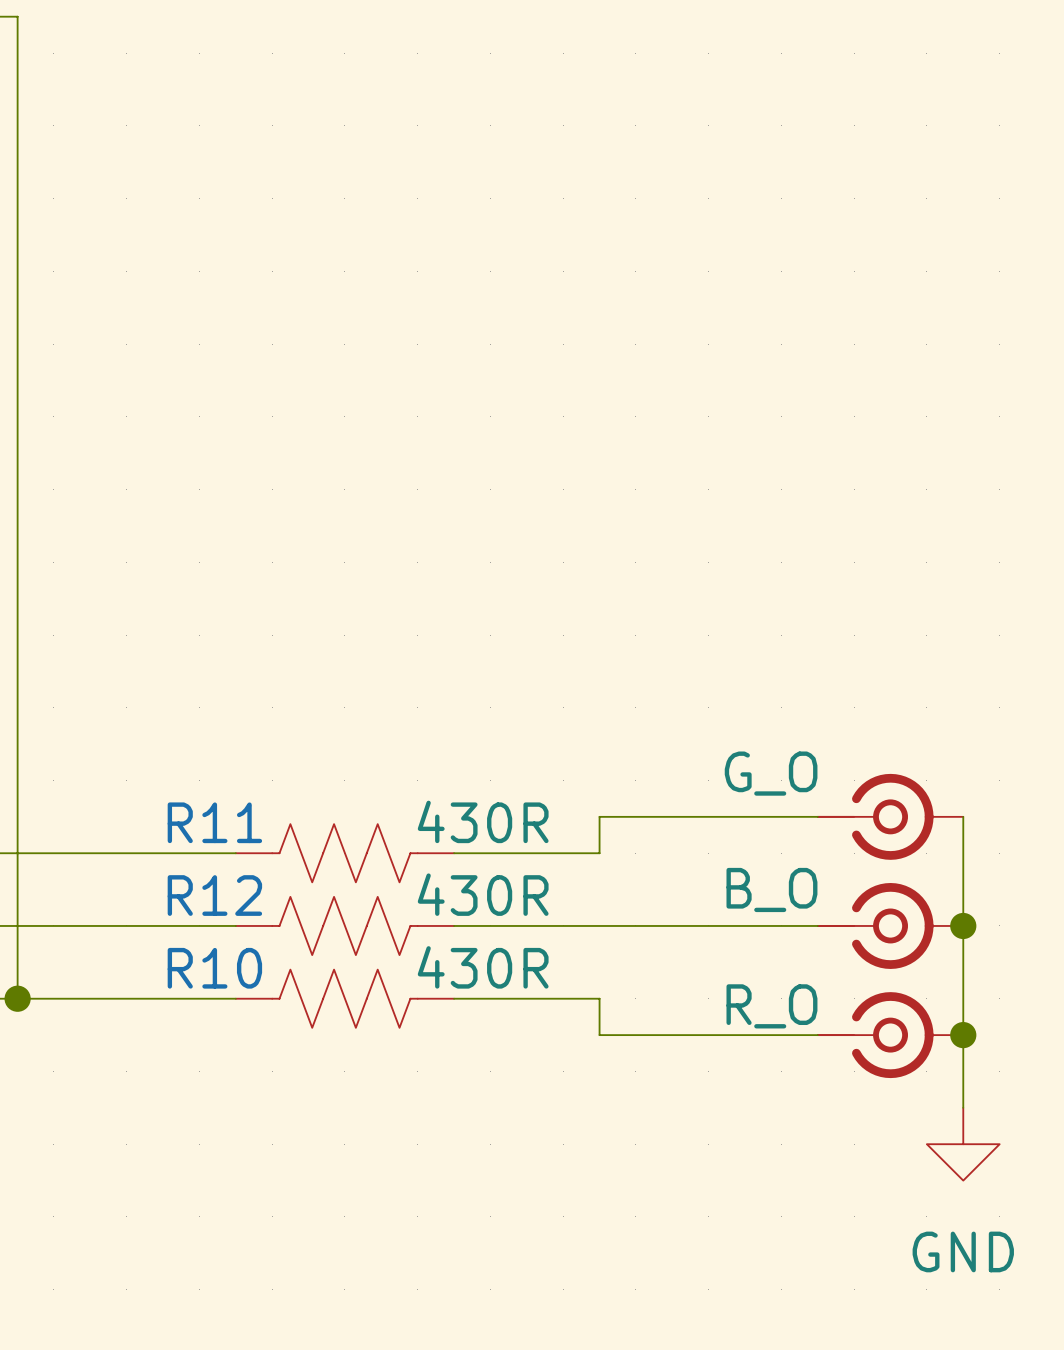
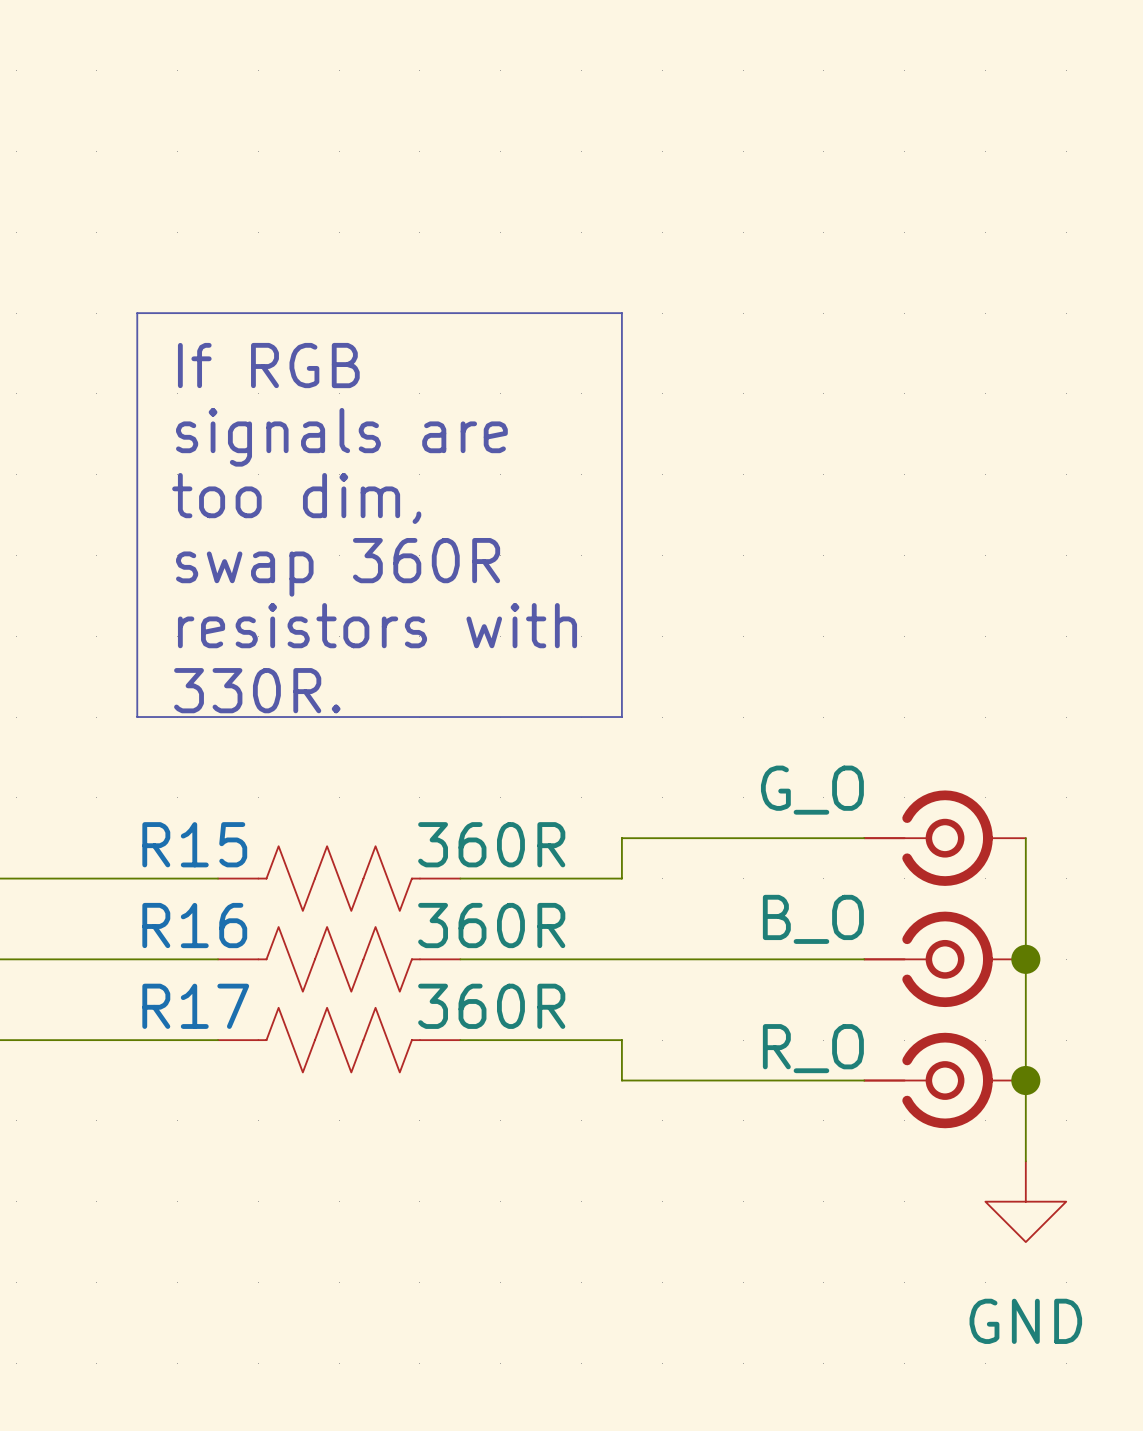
line: none -> (137, 313) (621, 313) (621, 717) (137, 717) (137, 313)
text: none -> If RGB (268, 365)
text: none -> signals are (341, 437)
text: none -> too dim, (296, 498)
text: none -> swap 360R (338, 567)
text: none -> resistors with (377, 625)
text: none -> 330R. (257, 690)
R11 value: 430R (483, 821) -> 360R (491, 844)
R11 name: R11 (214, 822) -> R15 (194, 844)
R12 value: 430R (483, 894) -> 360R (491, 925)
R12 name: R12 (214, 895) -> R16 (194, 925)
R10 value: 430R (483, 967) -> 360R (491, 1006)
R10 name: R10 (214, 968) -> R17 (195, 1006)

